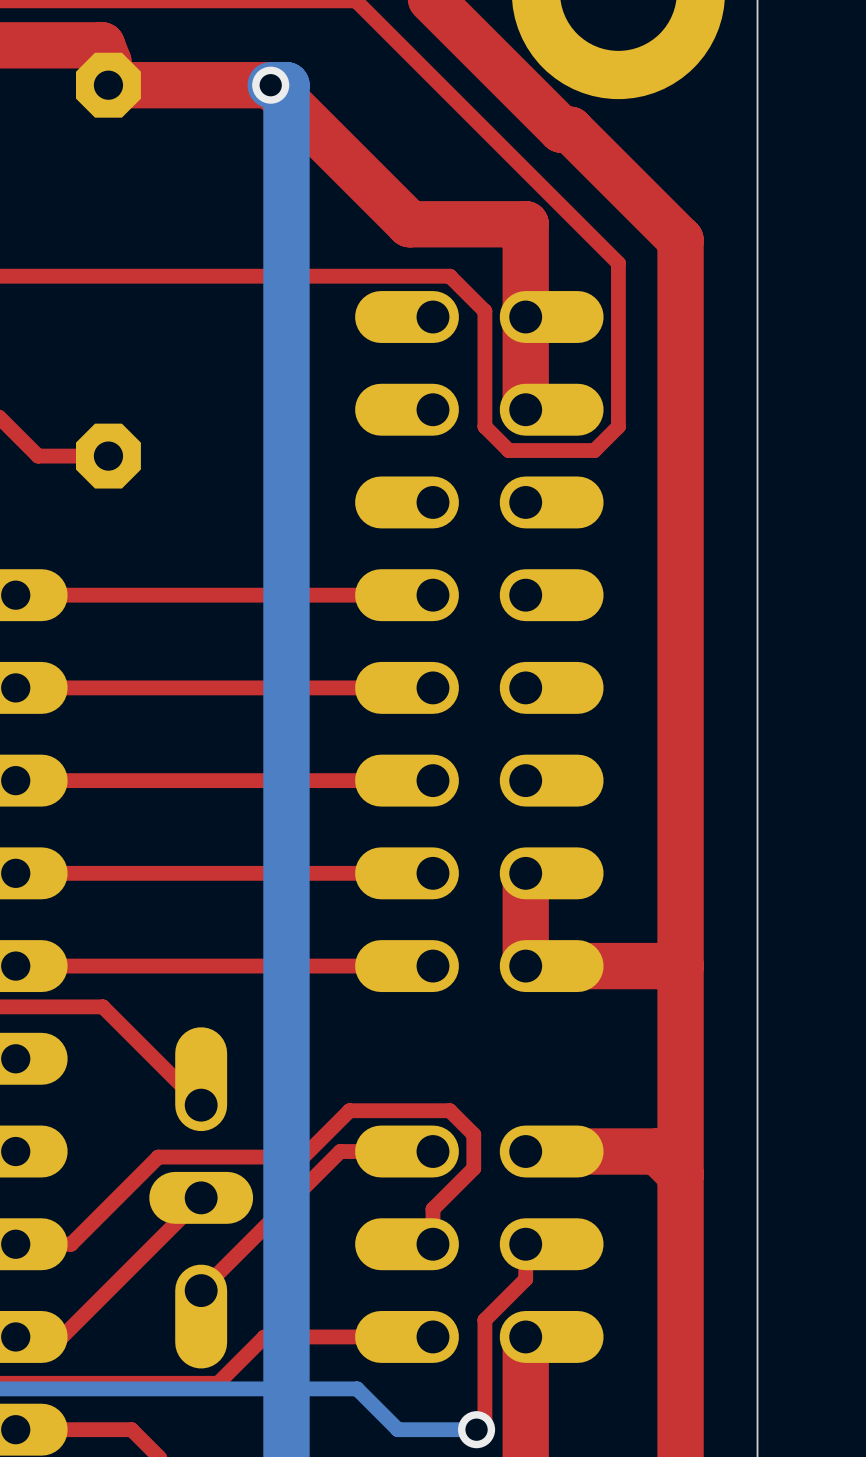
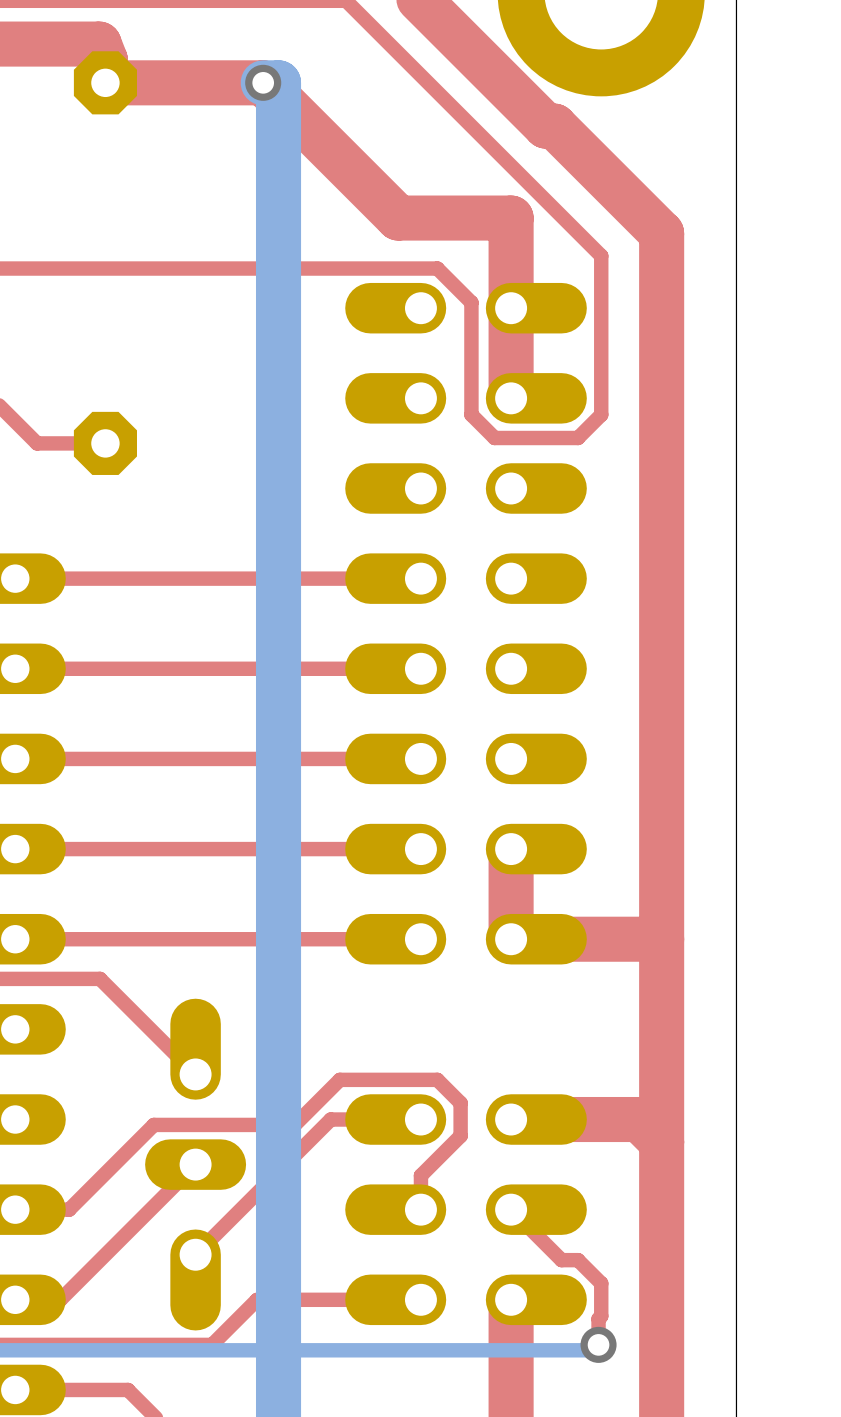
top track: (525, 1244) (525, 1279) (484, 1320) (484, 1421) (476, 1429) -> (511, 1209) (561, 1260) (578, 1260) (601, 1283) (598, 1344)
bottom track: (357, 1388) (397, 1429) (479, 1429) -> (347, 1350) (593, 1350) (598, 1344) (601, 1344)
via position: (476, 1429) -> (598, 1344)

